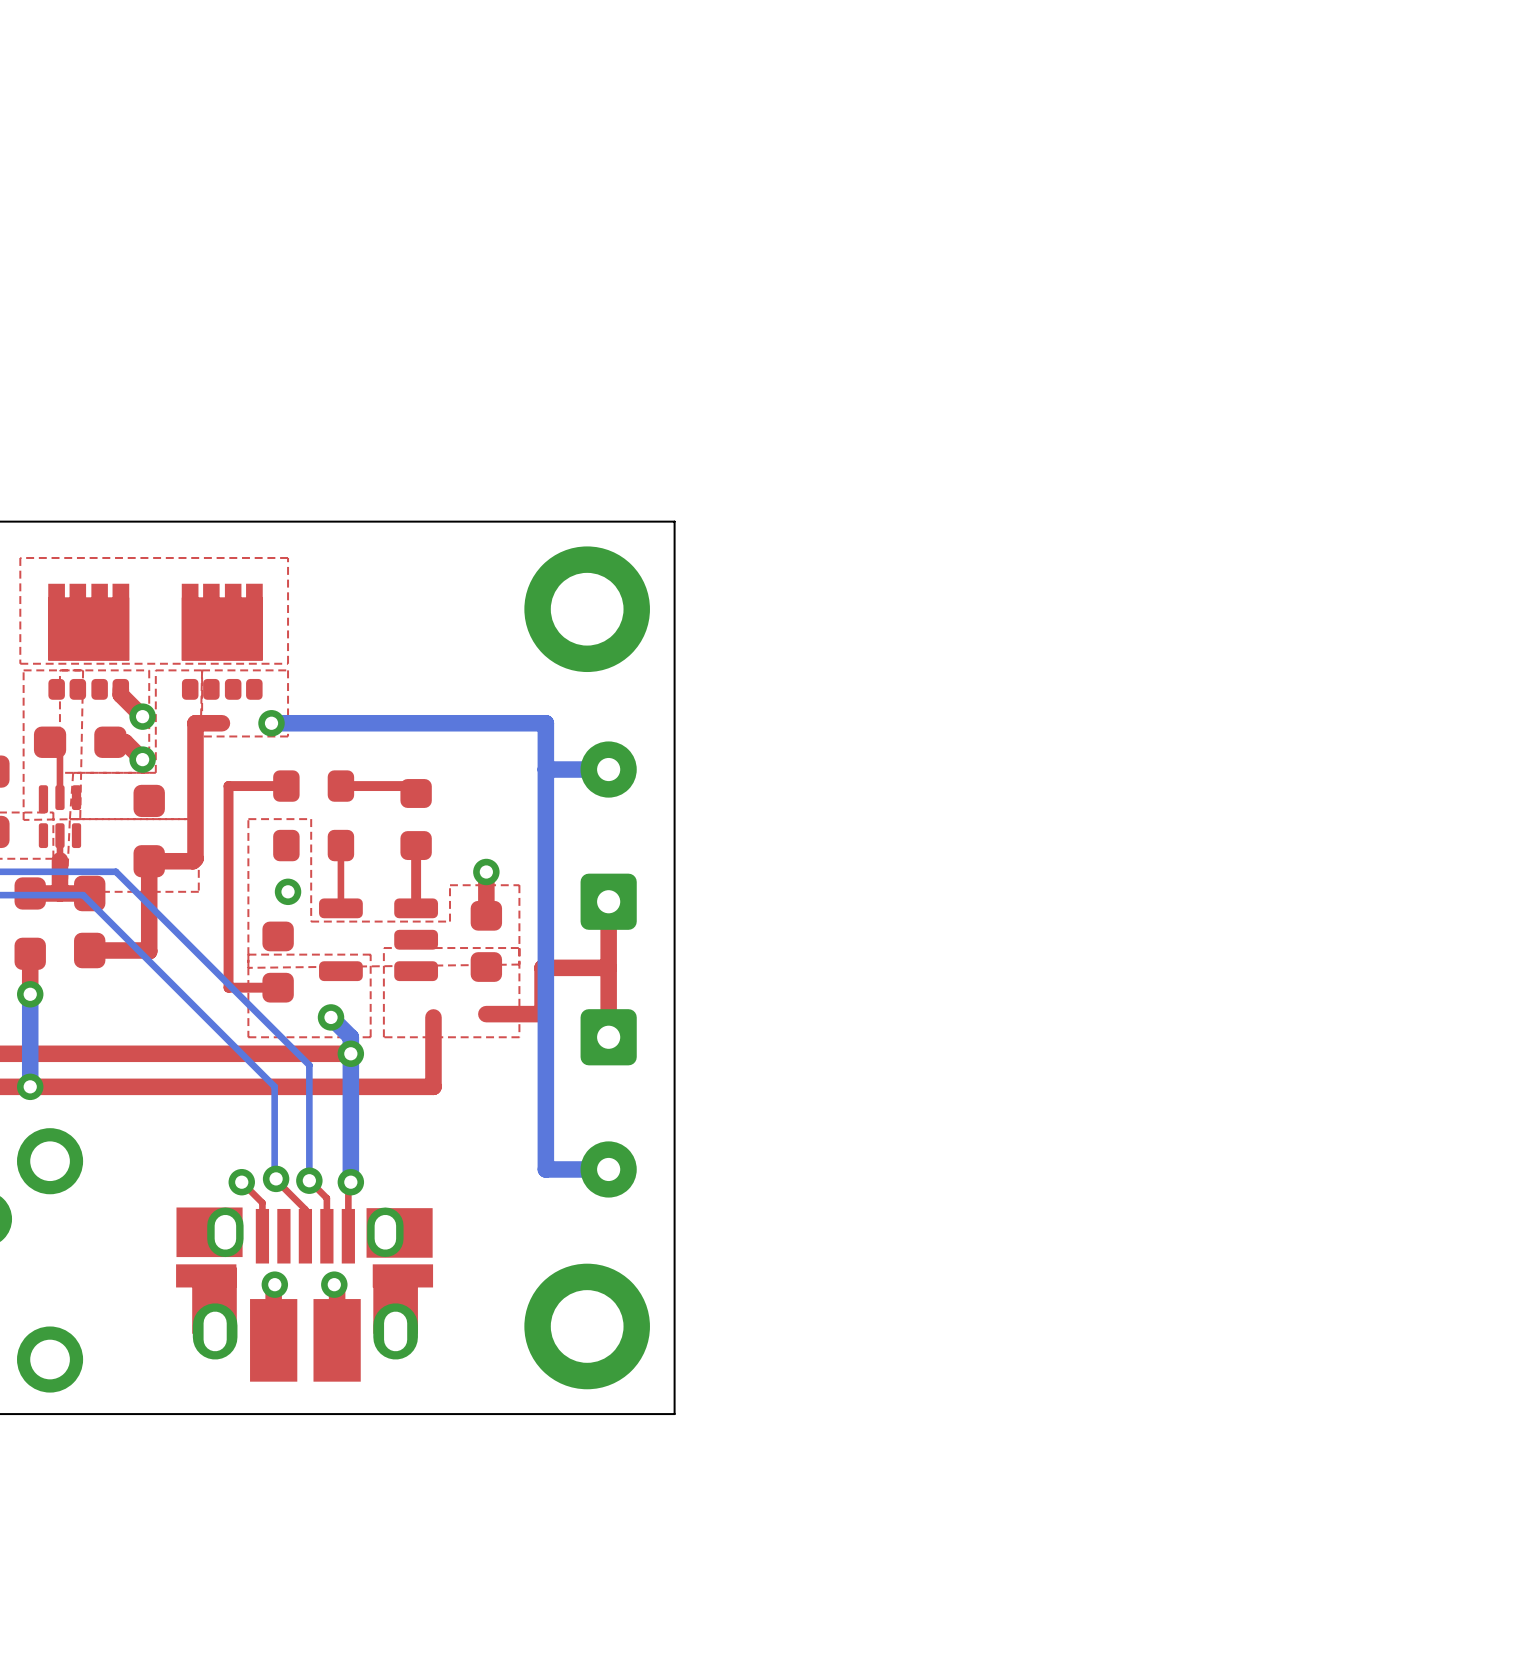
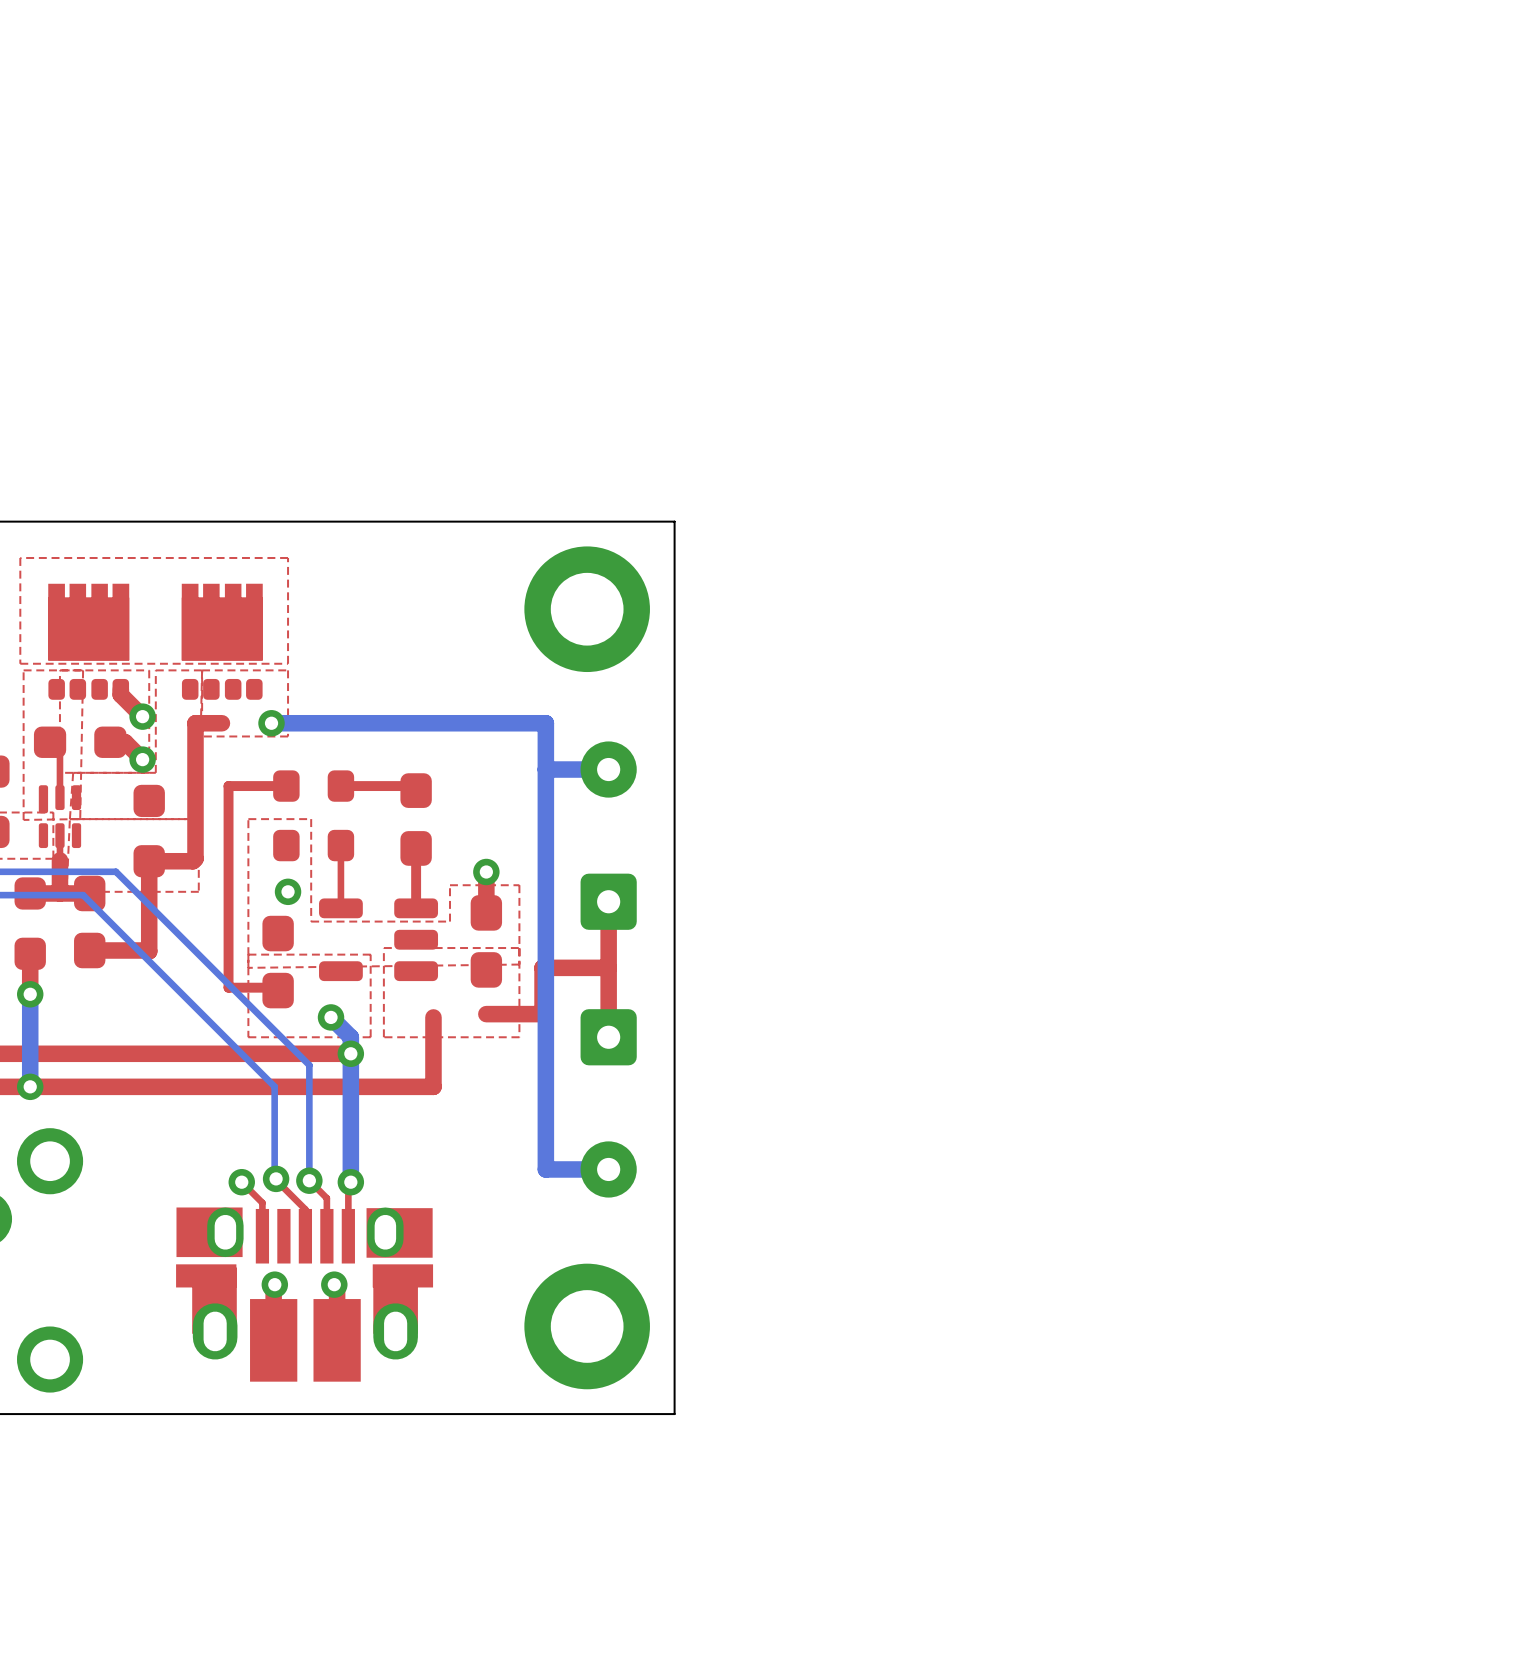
part footprint: [400, 779, 432, 861] -> [400, 773, 432, 866]
part footprint: [470, 900, 503, 982] -> [470, 895, 503, 988]
part footprint: [262, 921, 294, 1003] -> [262, 915, 294, 1009]

